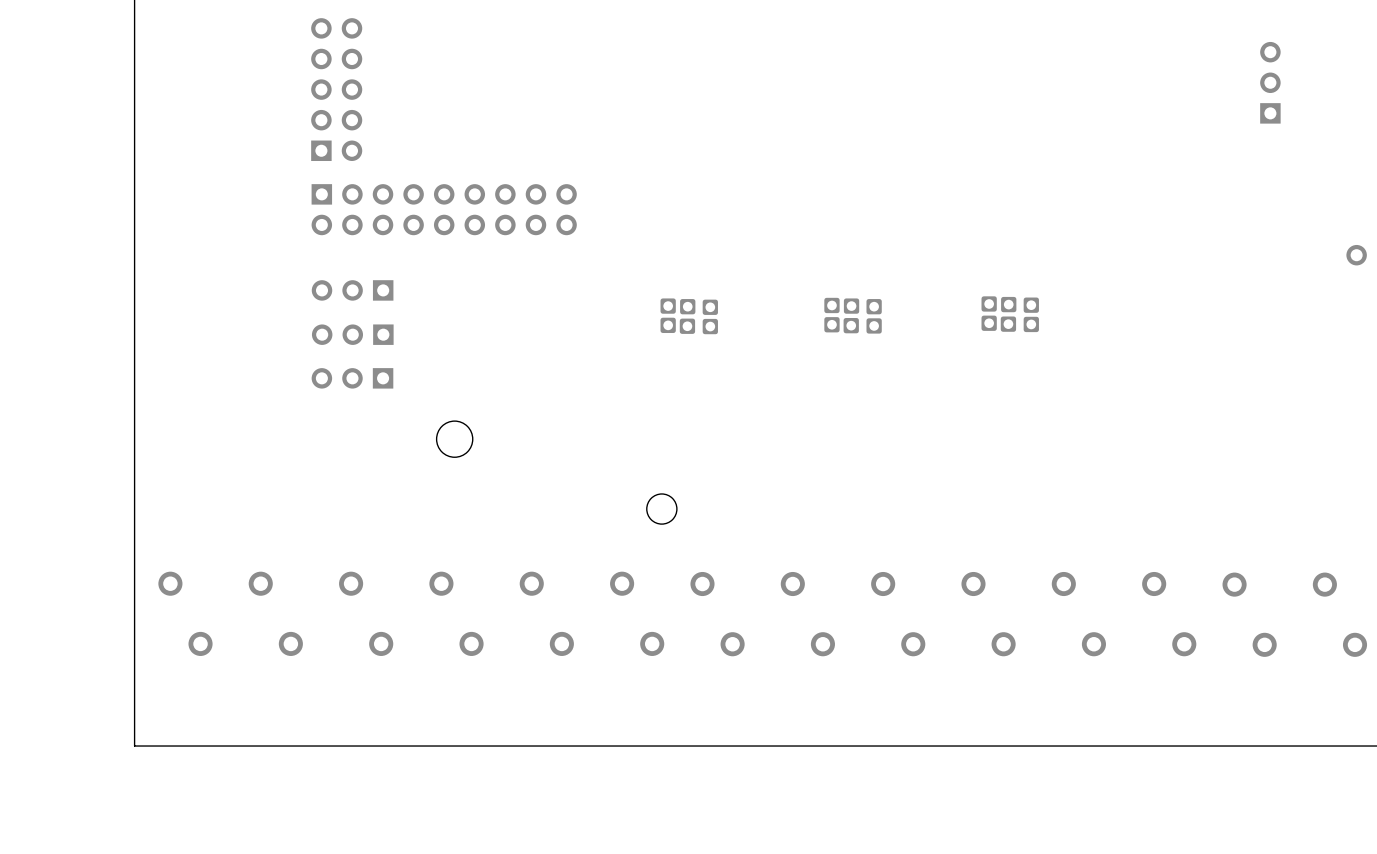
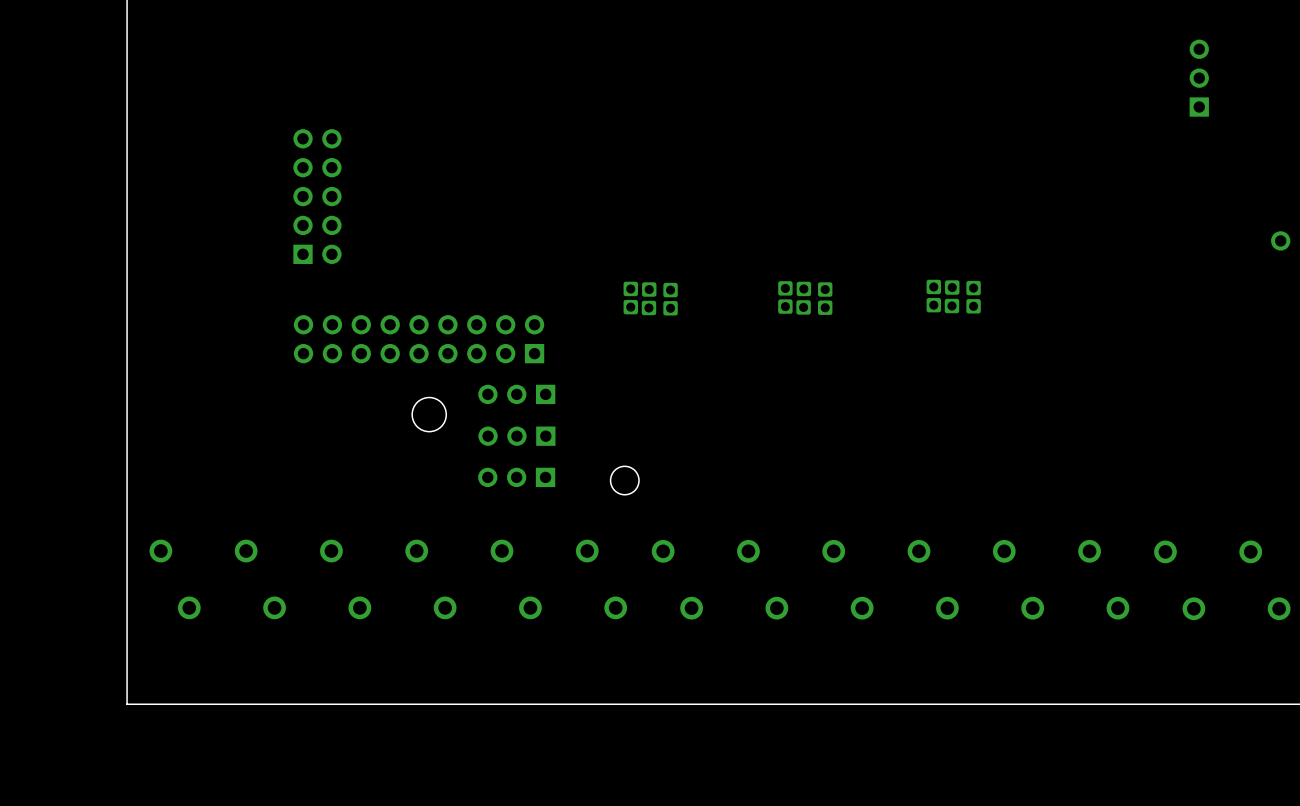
part position: (336, 89) -> (317, 196)
part rotation: 0° (444, 209) -> 180° (419, 339)
part: (352, 290) -> none
part: (352, 334) -> none
part: (352, 378) -> none
part: none -> (516, 394)
part: none -> (516, 436)
part: none -> (516, 477)

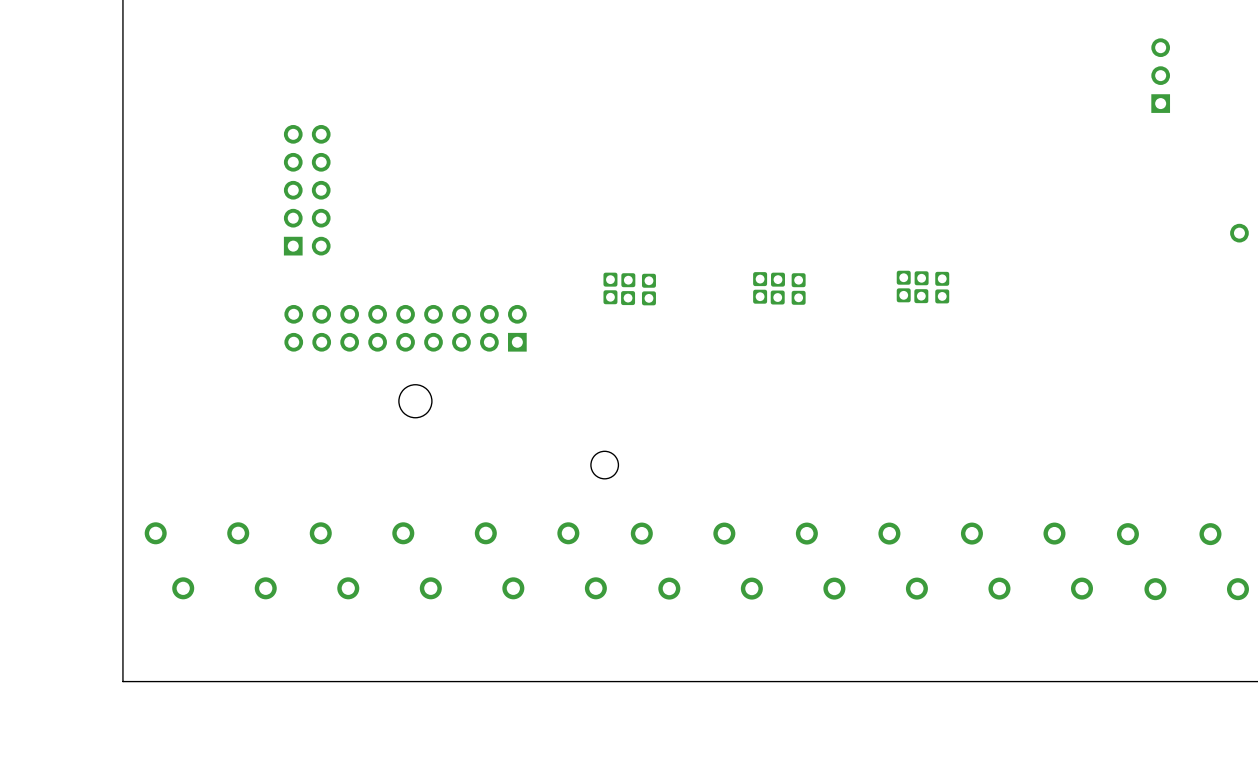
part: (516, 394) -> none
part: (516, 436) -> none
part: (516, 477) -> none

